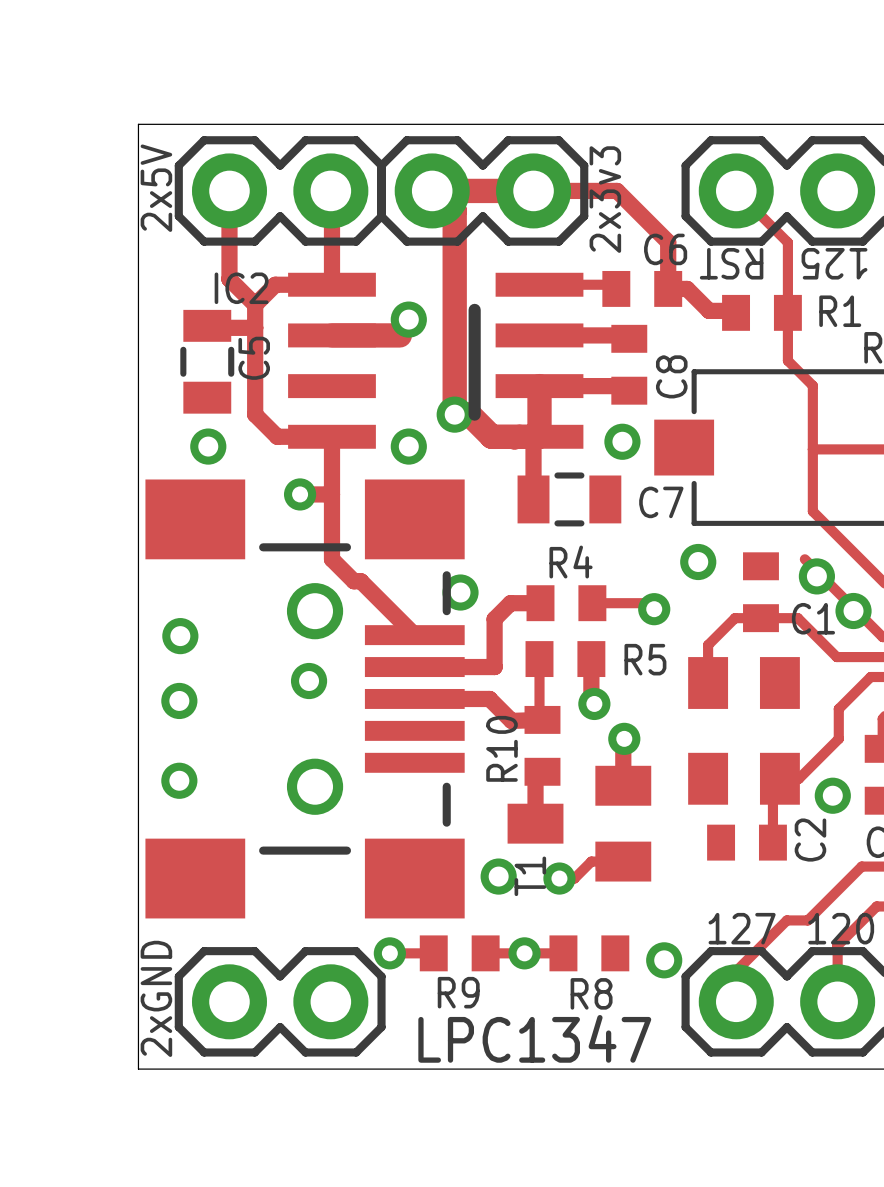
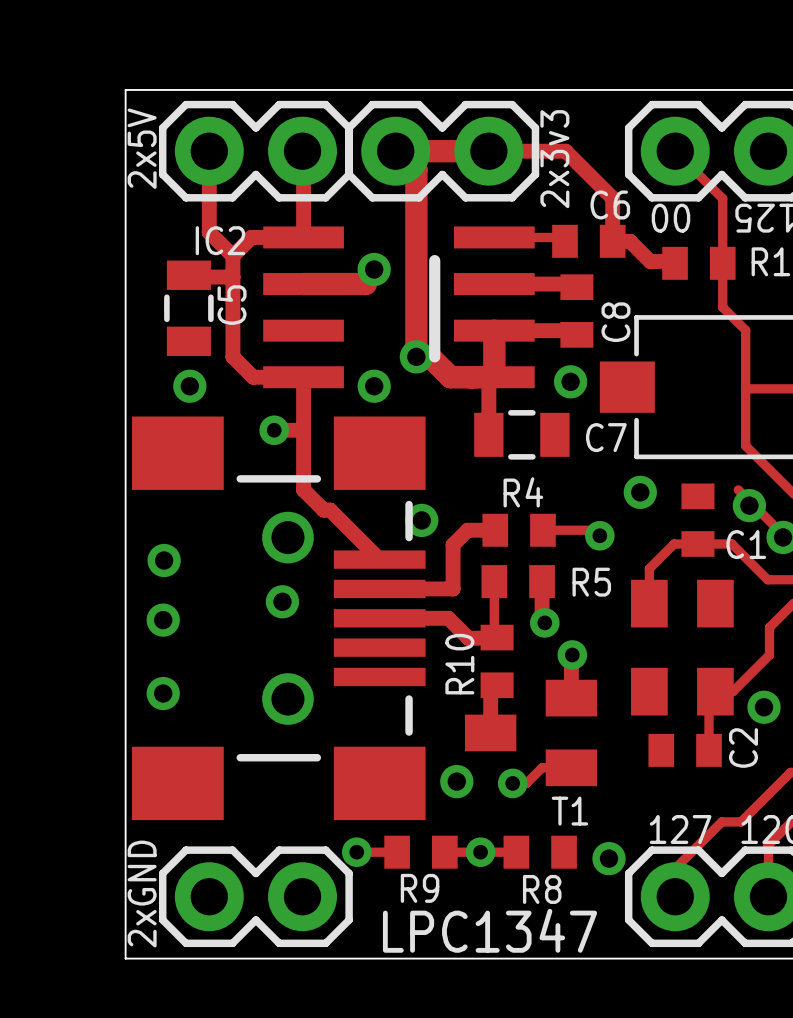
text: RST (731, 263) -> 00 (670, 218)
T1 name rotation: 0° (530, 876) -> 90° clockwise (569, 811)
T1 name position: T1 (530, 876) -> T1 (569, 811)

